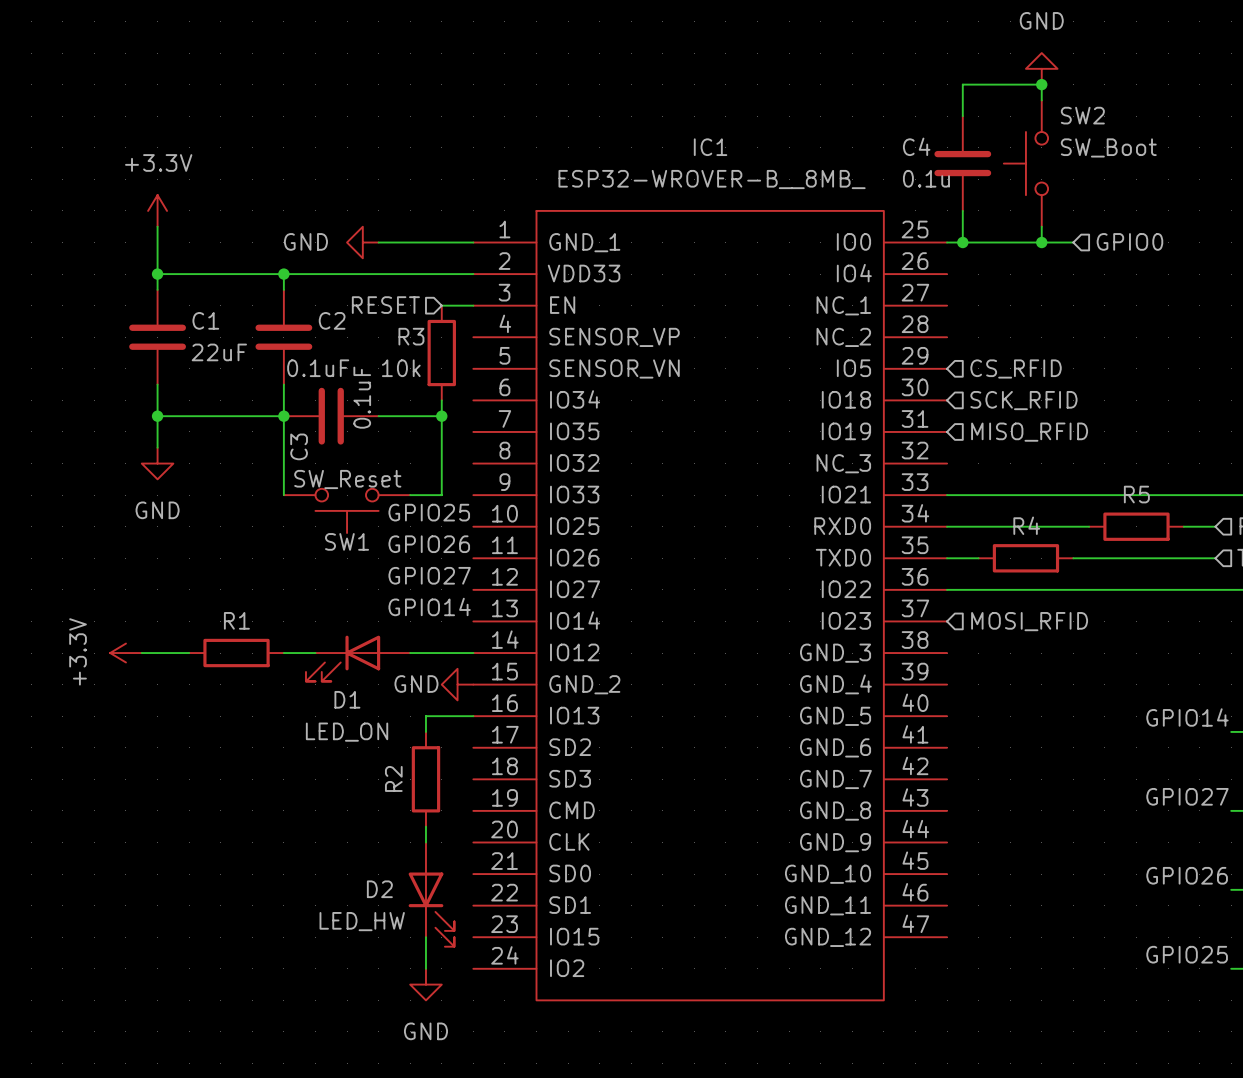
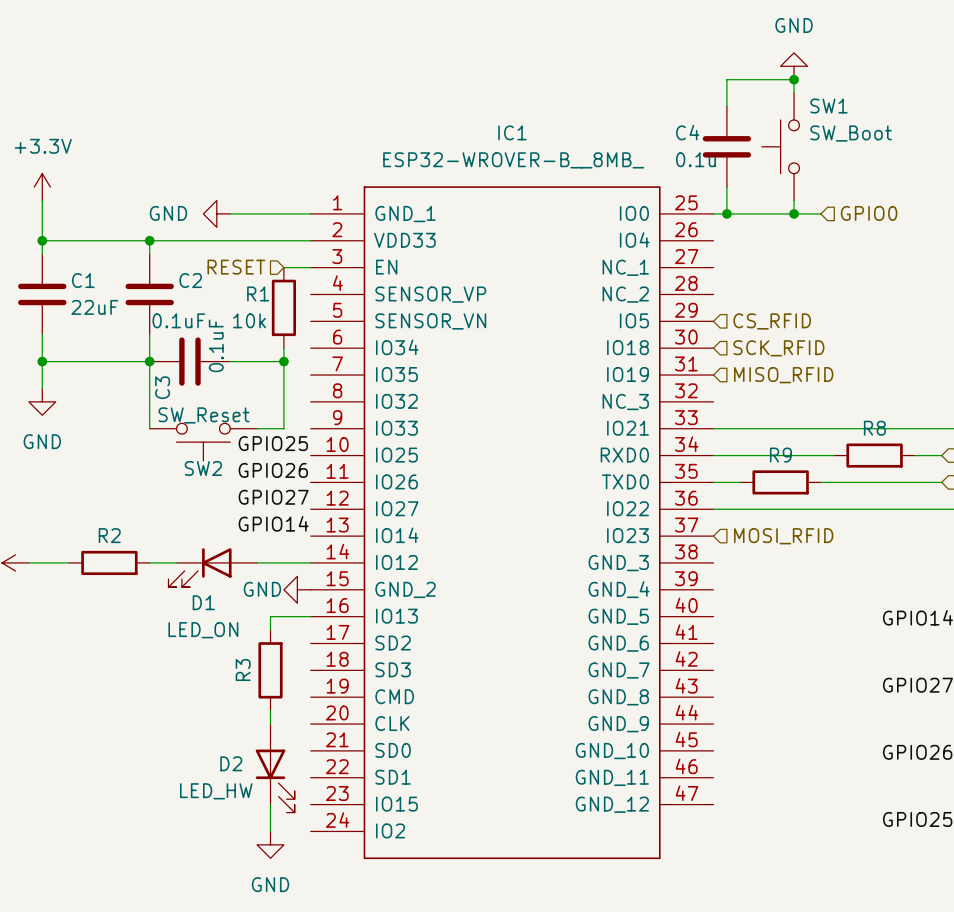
SW2 name: SW2 (1082, 115) -> SW1 (828, 106)
R3 name: R3 (411, 336) -> R1 (258, 293)
R5 name: R5 (1136, 494) -> R8 (874, 428)
R4 name: R4 (1026, 525) -> R9 (780, 455)
SW1 name: SW1 (347, 541) -> SW2 (203, 468)
R1 name: R1 (236, 620) -> R2 (109, 535)
R2 name: R2 (393, 778) -> R3 (243, 670)

